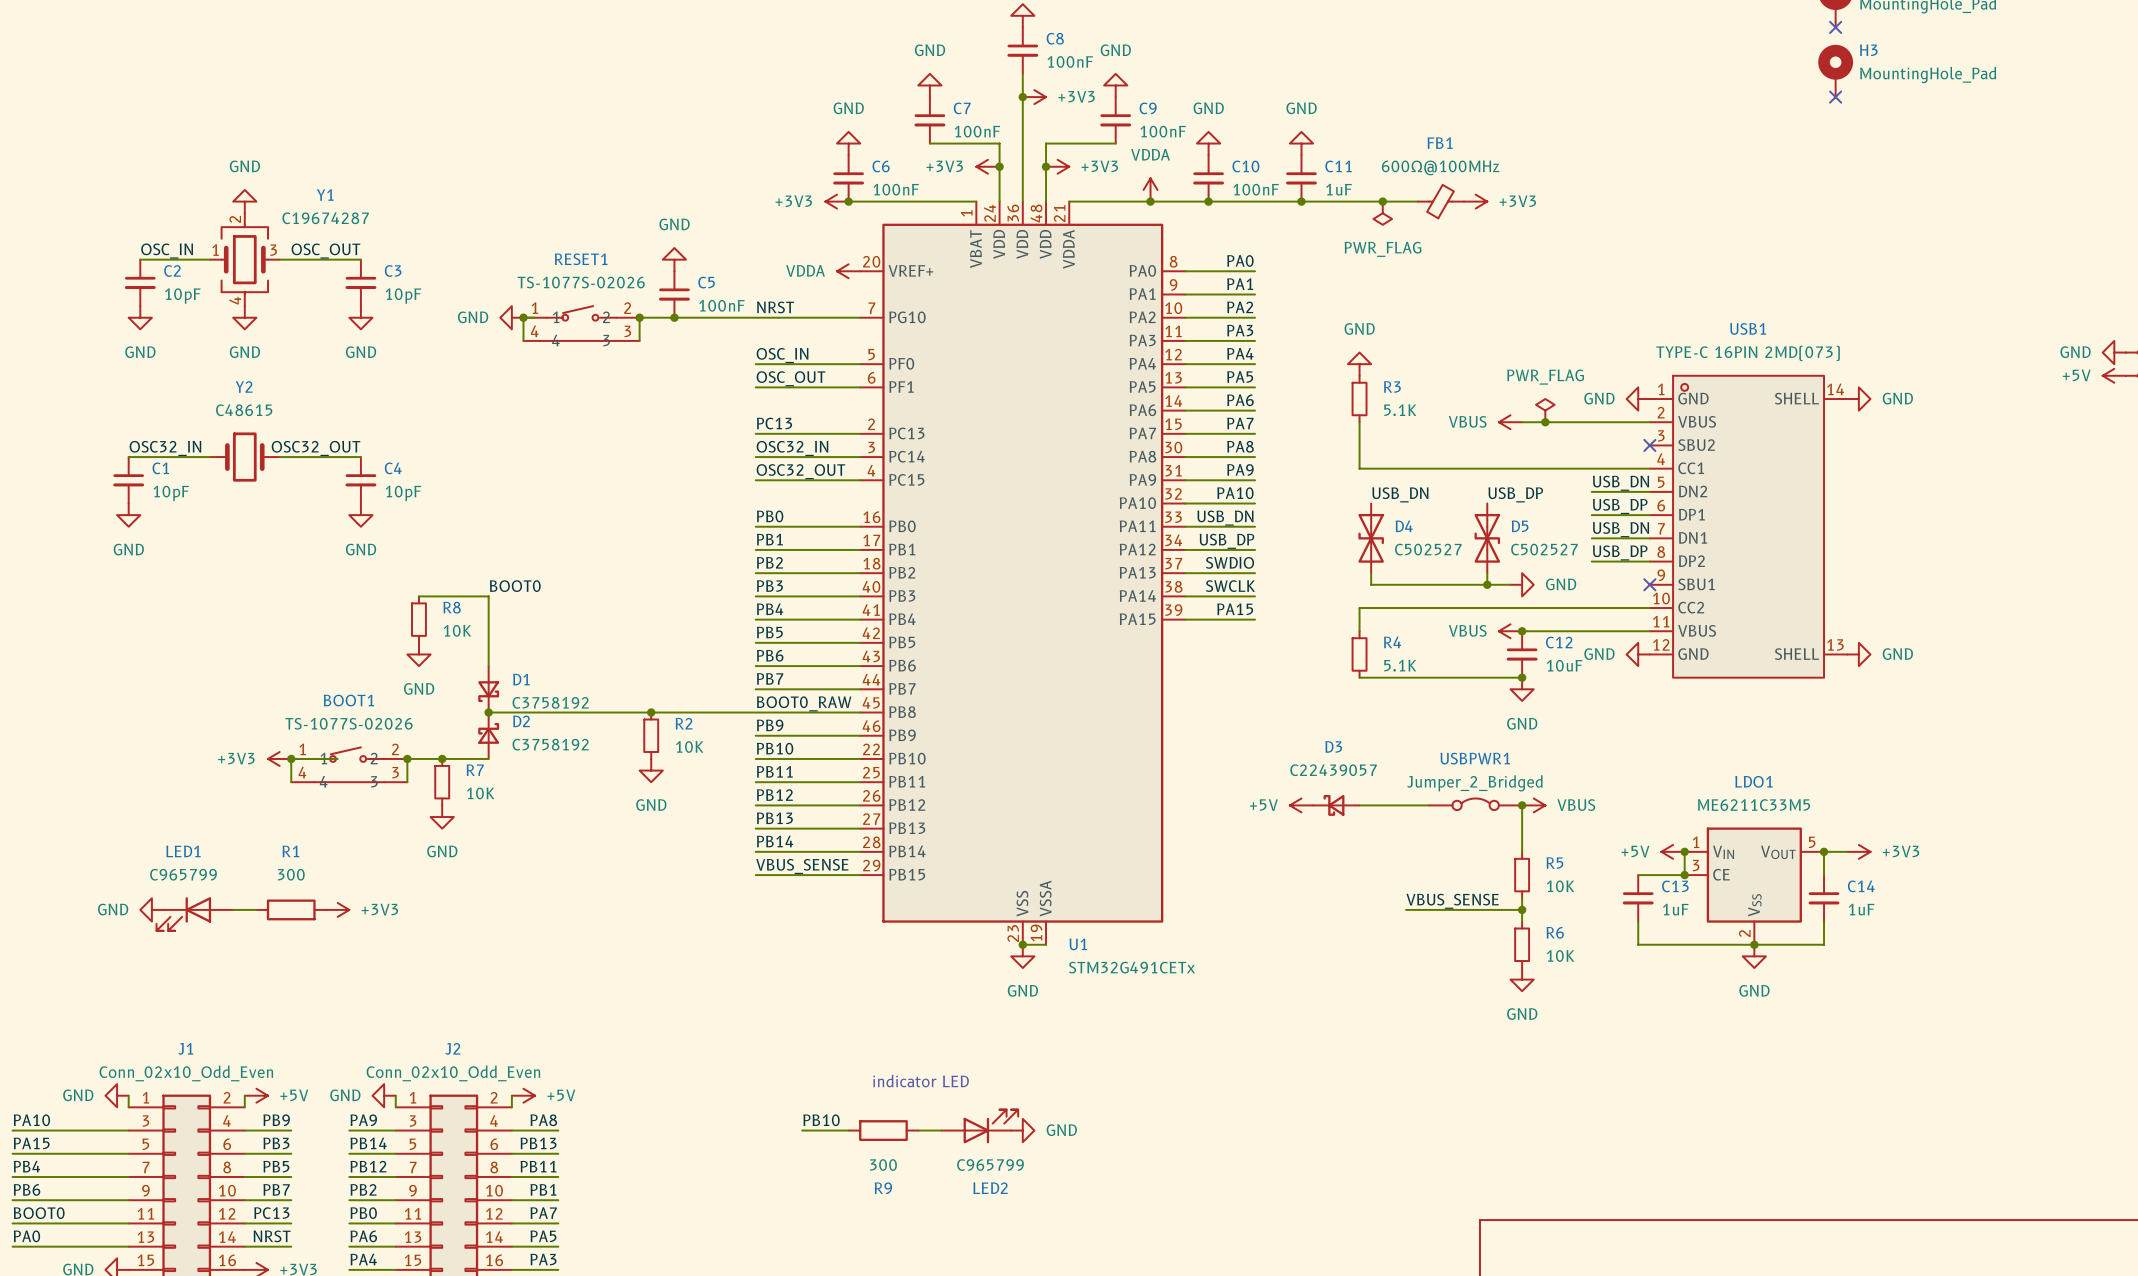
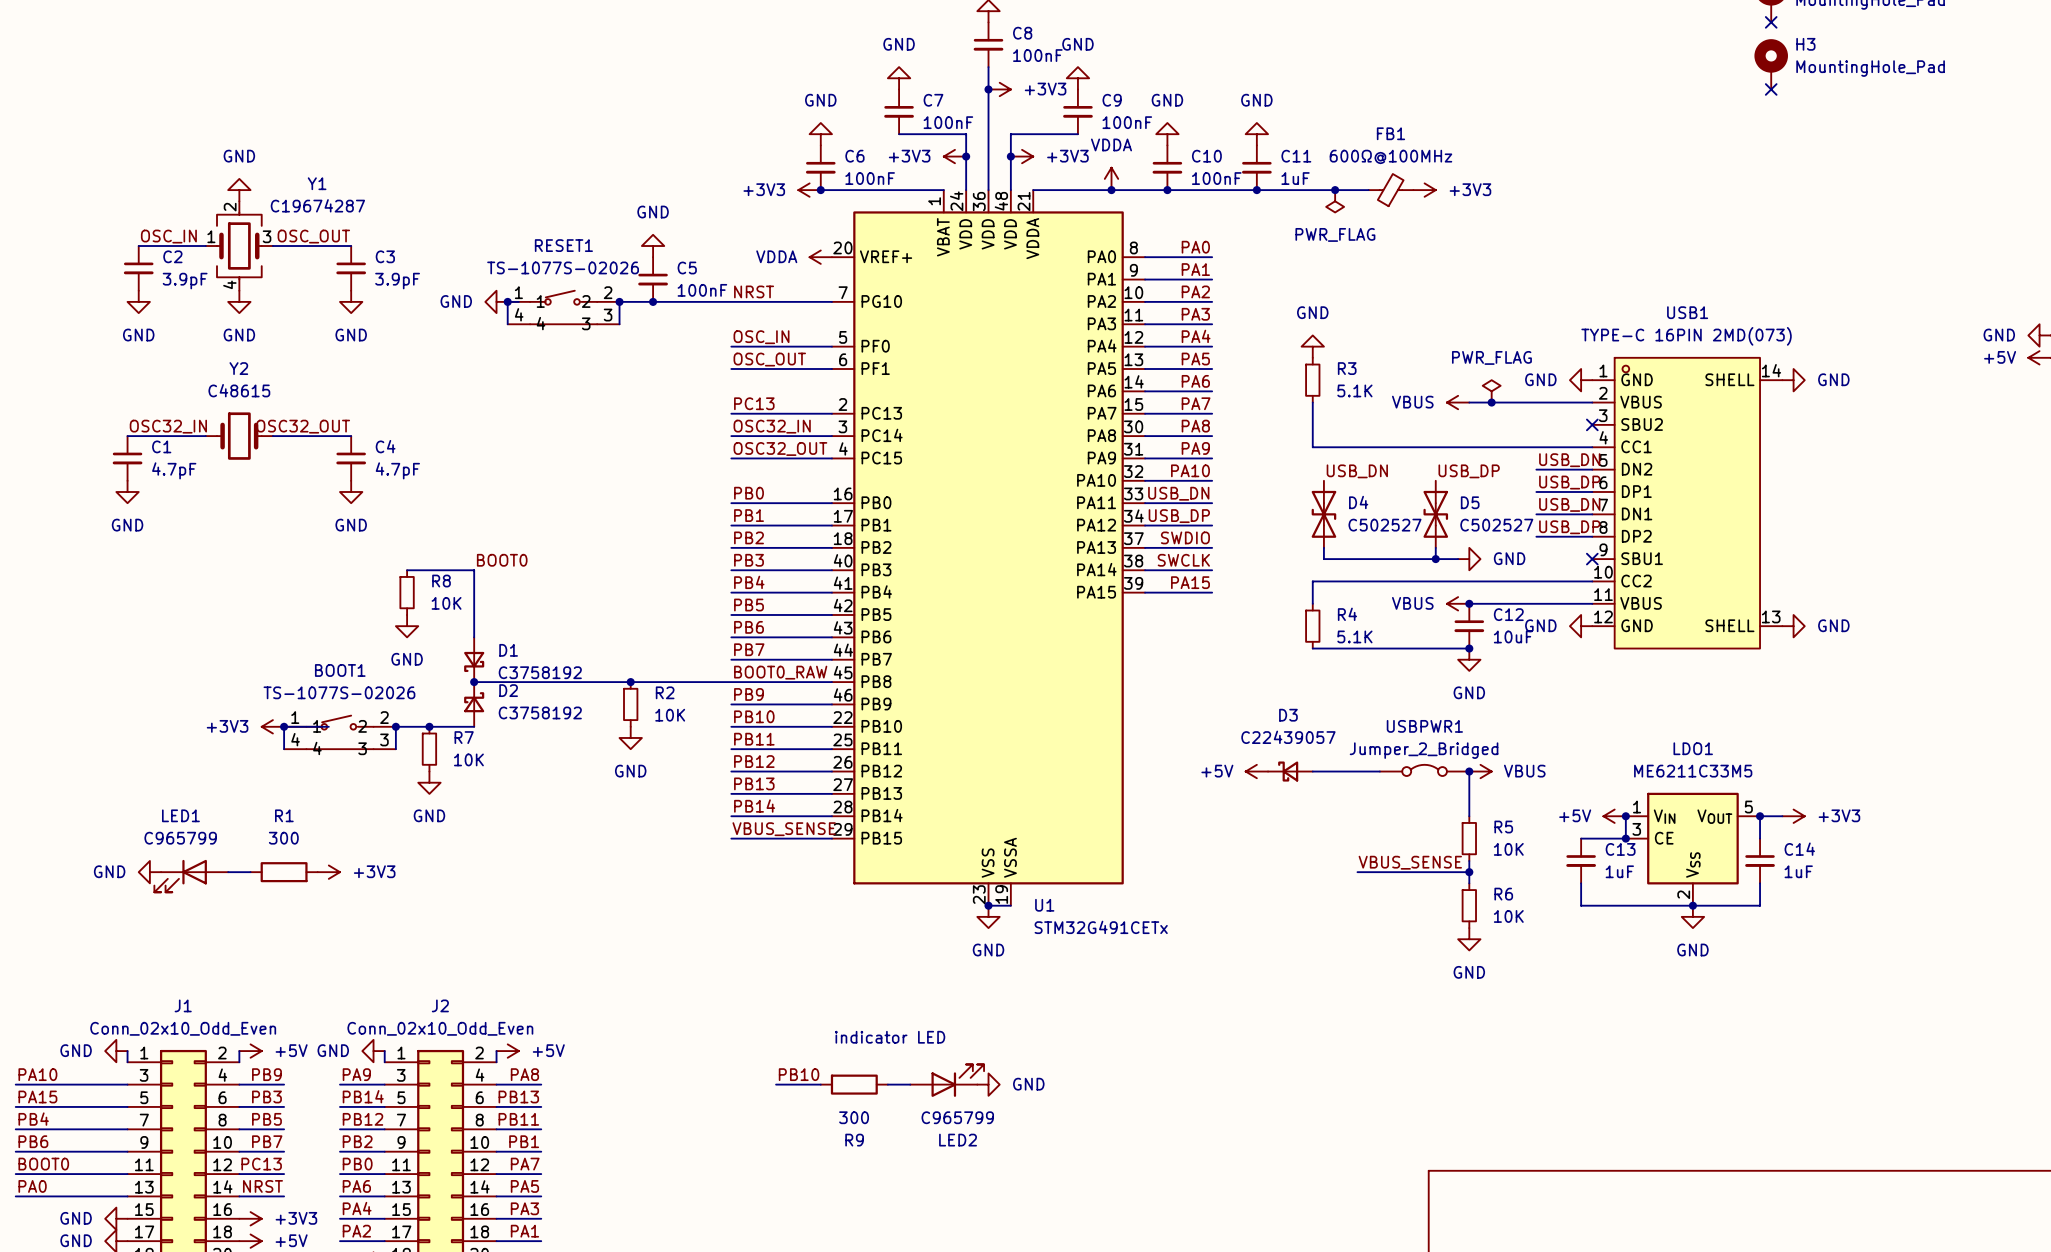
C2 value: 10pF (182, 296) -> 3.9pF (185, 281)
C3 value: 10pF (403, 296) -> 3.9pF (397, 281)
C1 value: 10pF (171, 493) -> 4.7pF (174, 470)
C4 value: 10pF (403, 493) -> 4.7pF (397, 470)

